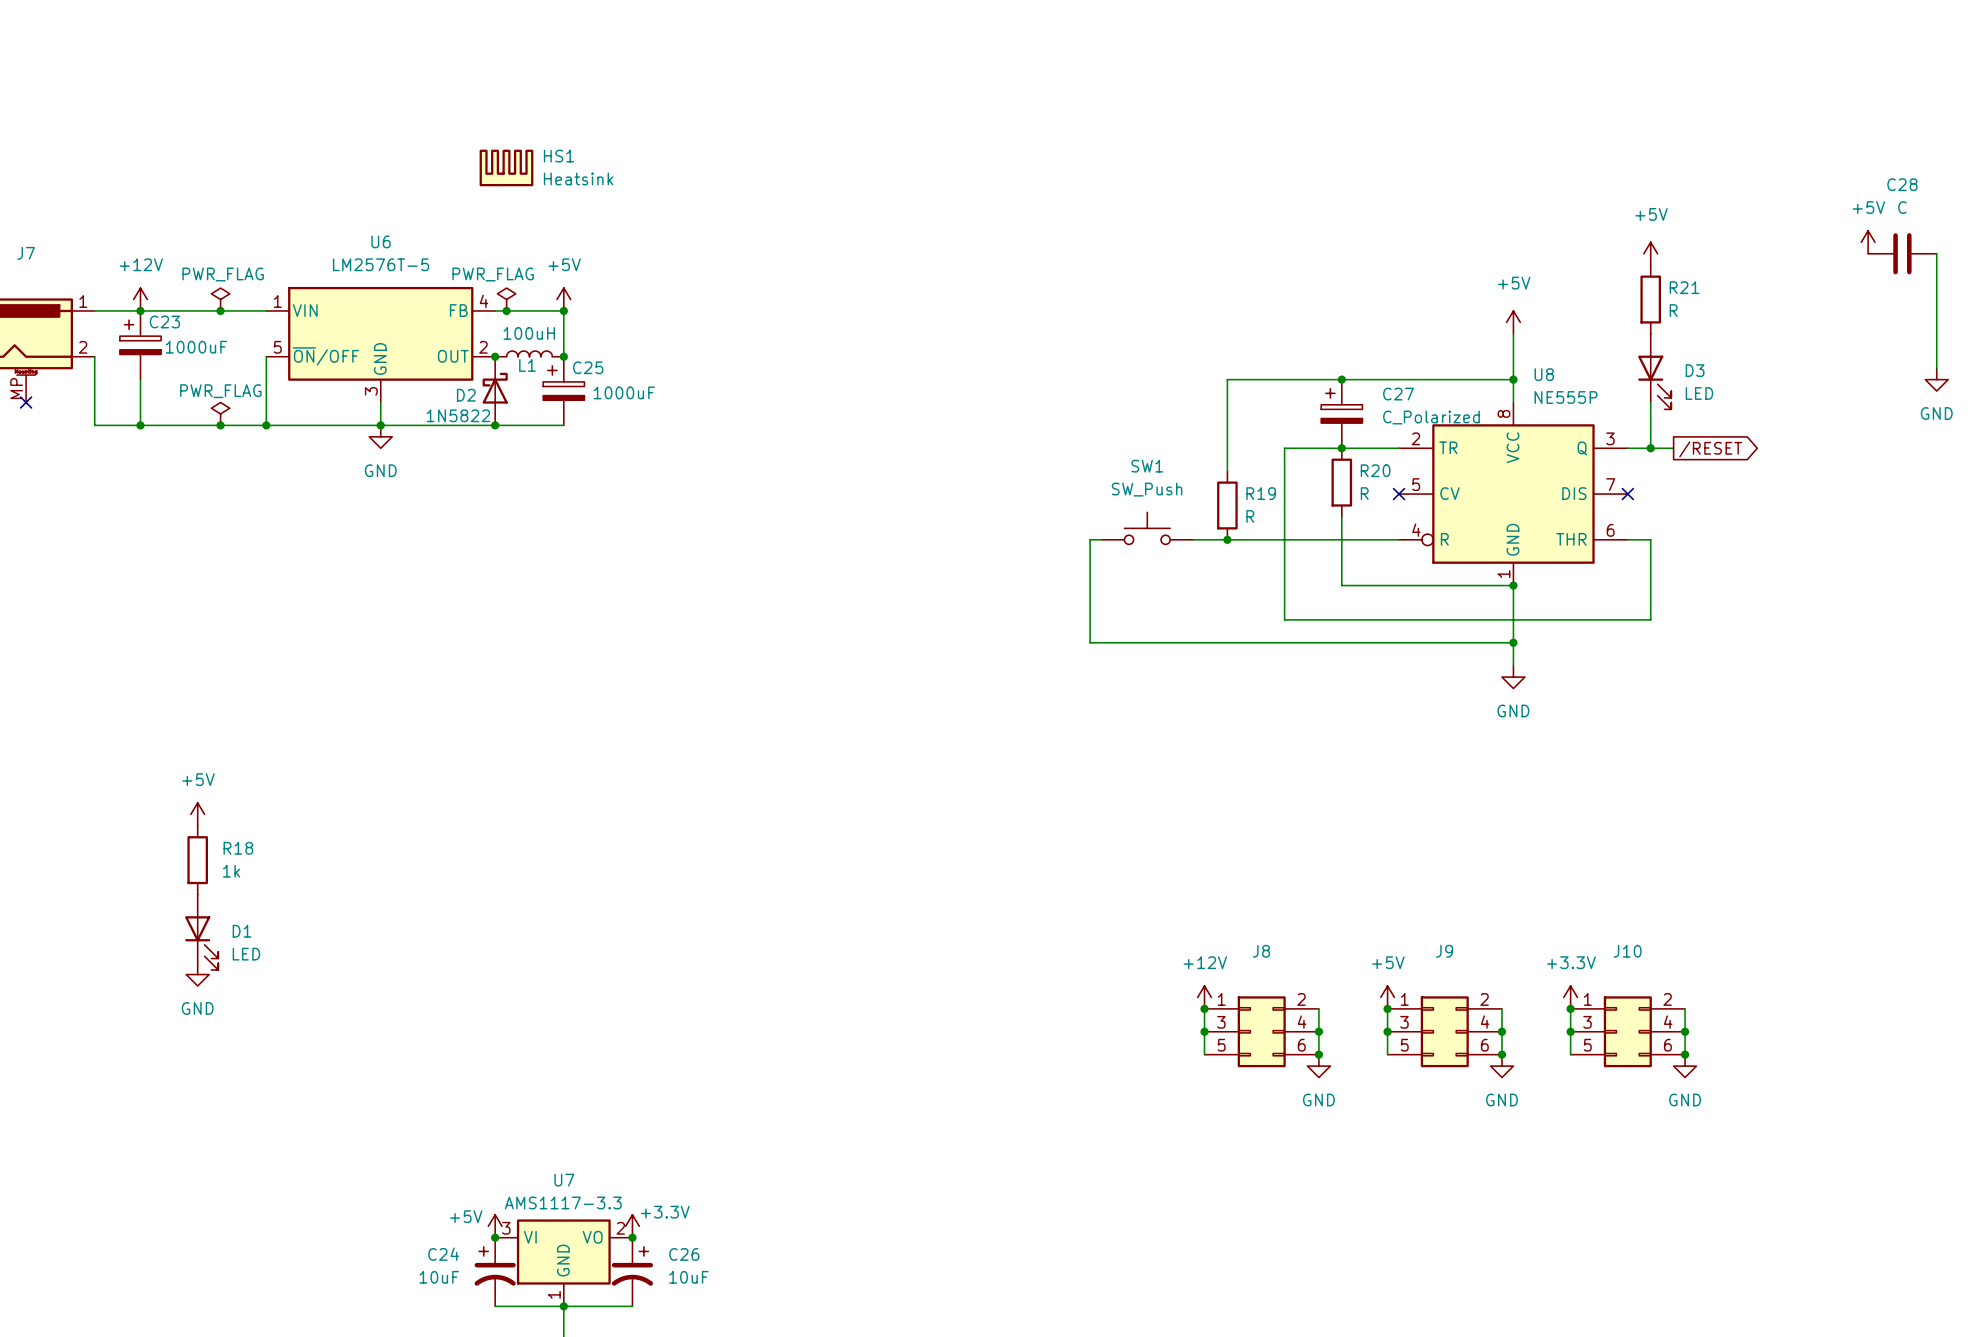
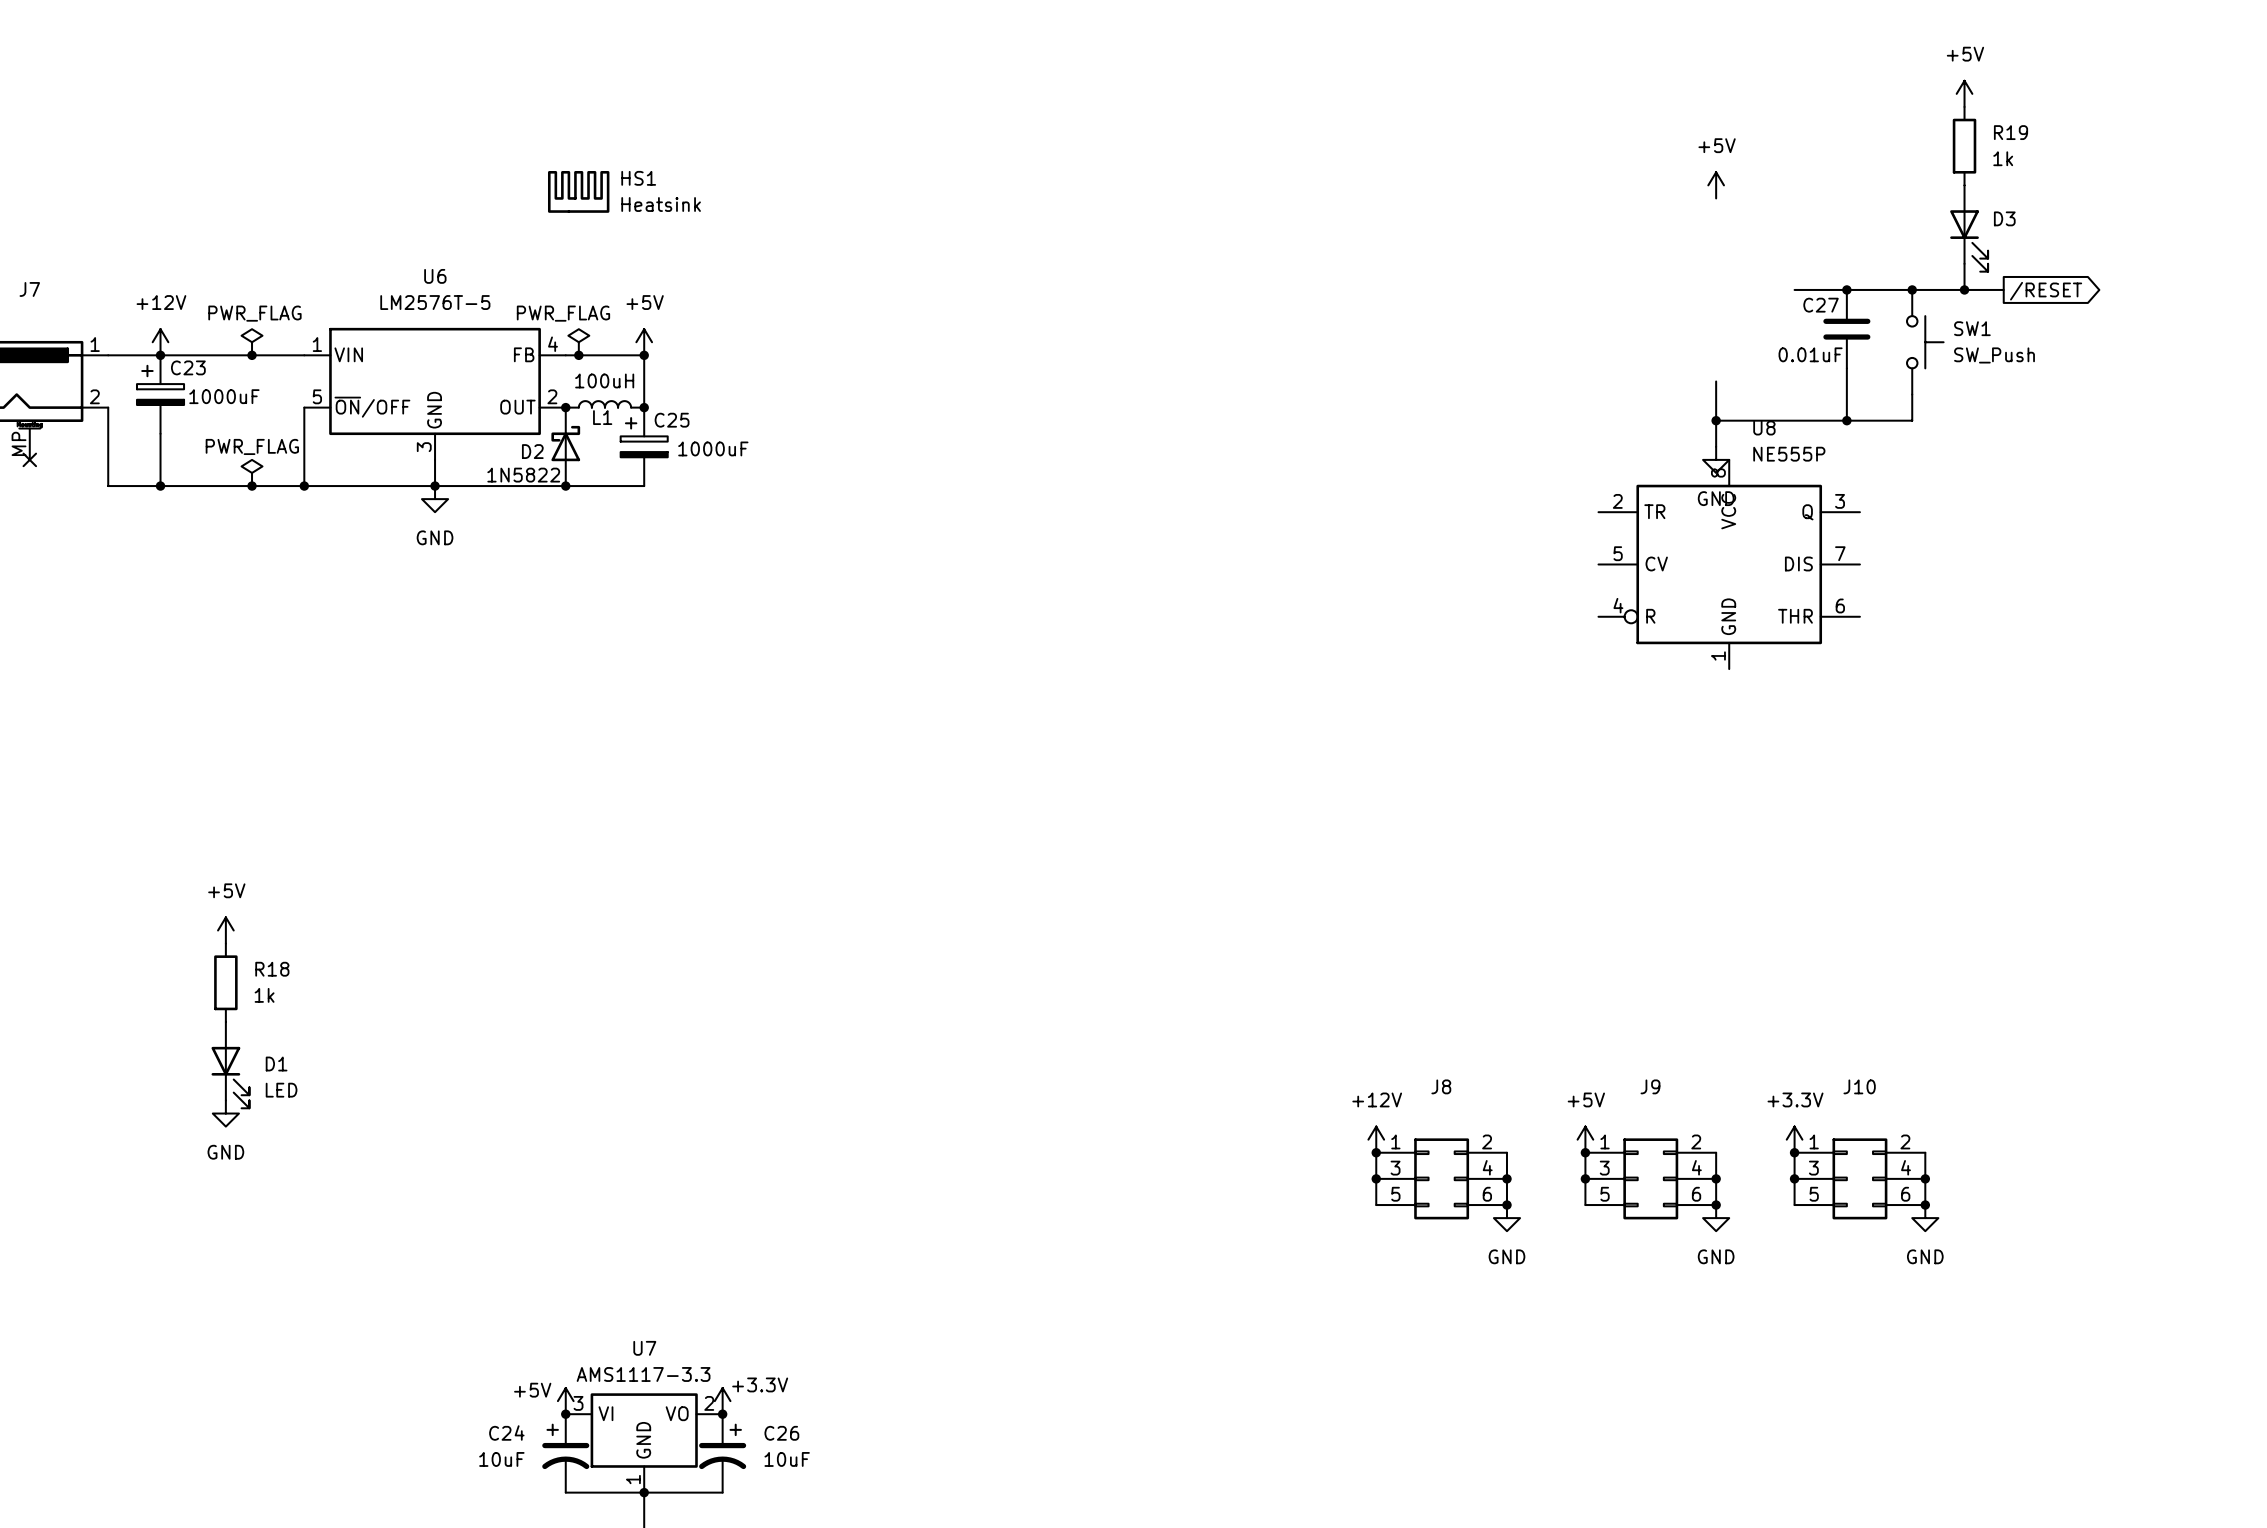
power symbol: none -> +5V (1964, 93)
power symbol: none -> +5V (1716, 185)
wire: none -> (1964, 263) (1964, 289)
power symbol: +5V (1868, 242) -> none
wire: none -> (1794, 289) (2003, 289)
junction: none -> (1846, 289)
power symbol: +5V (1650, 253) -> none
junction: none -> (1912, 289)
junction: none -> (1964, 289)
C28: C (1902, 253) -> none
wire: (1936, 253) (1936, 368) -> none
R21: R (1650, 299) -> none
power symbol: +5V (1513, 322) -> none
wire: none -> (1716, 381) (1716, 446)
wire: (1513, 333) (1513, 402) -> none
wire: none -> (1912, 394) (1912, 420) (1716, 420)
junction: none -> (1846, 420)
D3 name position: D3 (1695, 370) -> D3 (2004, 218)
D3 position: (1654, 371) -> (1969, 228)
C27 symbol: [1321, 379, 1363, 449] -> [1823, 289, 1871, 369]
junction: (1341, 379) -> none
wire: (1513, 379) (1227, 379) (1227, 471) -> none
junction position: (1513, 379) -> (1716, 420)
power symbol: GND (1936, 379) -> none
D3 value: LED (1699, 393) -> none
C27 name position: C27 (1398, 394) -> C27 (1821, 305)
power symbol: none -> GND (1716, 459)
wire: (1650, 402) (1650, 448) -> (1846, 368) (1846, 420)
C27 value: C_Polarized (1431, 417) -> 0.01uF (1810, 354)
junction: (1341, 448) -> none
wire: (1399, 448) (1284, 448) (1284, 619) (1650, 619) (1650, 539) (1627, 539) -> none
wire: (1627, 448) (1673, 448) -> none
junction: (1650, 448) -> none
global label position: /RESET (1710, 449) -> /RESET (2046, 291)
SW1 name position: SW1 (1147, 466) -> SW1 (1972, 328)
R20: R (1341, 482) -> none
SW1 value position: SW_Push (1147, 489) -> SW_Push (1994, 355)
R19 name position: R19 (1261, 493) -> R19 (2011, 132)
no-connect mark: (1399, 494) -> none
no-connect mark: (1627, 494) -> none
R19 position: (1227, 505) -> (1964, 146)
R19 value: R (1250, 516) -> 1k (2003, 158)
wire: (1341, 516) (1341, 585) (1513, 585) (1513, 665) -> none
SW1 rotation: 0° (1147, 528) -> 90° clockwise (1925, 342)
SW1 position: (1147, 528) -> (1925, 342)
wire: (1101, 539) (1090, 539) (1090, 642) (1513, 642) -> none
wire: (1193, 539) (1399, 539) -> none
junction: (1227, 539) -> none
junction: (1513, 585) -> none
junction: (1513, 642) -> none
power symbol: GND (1513, 677) -> none

